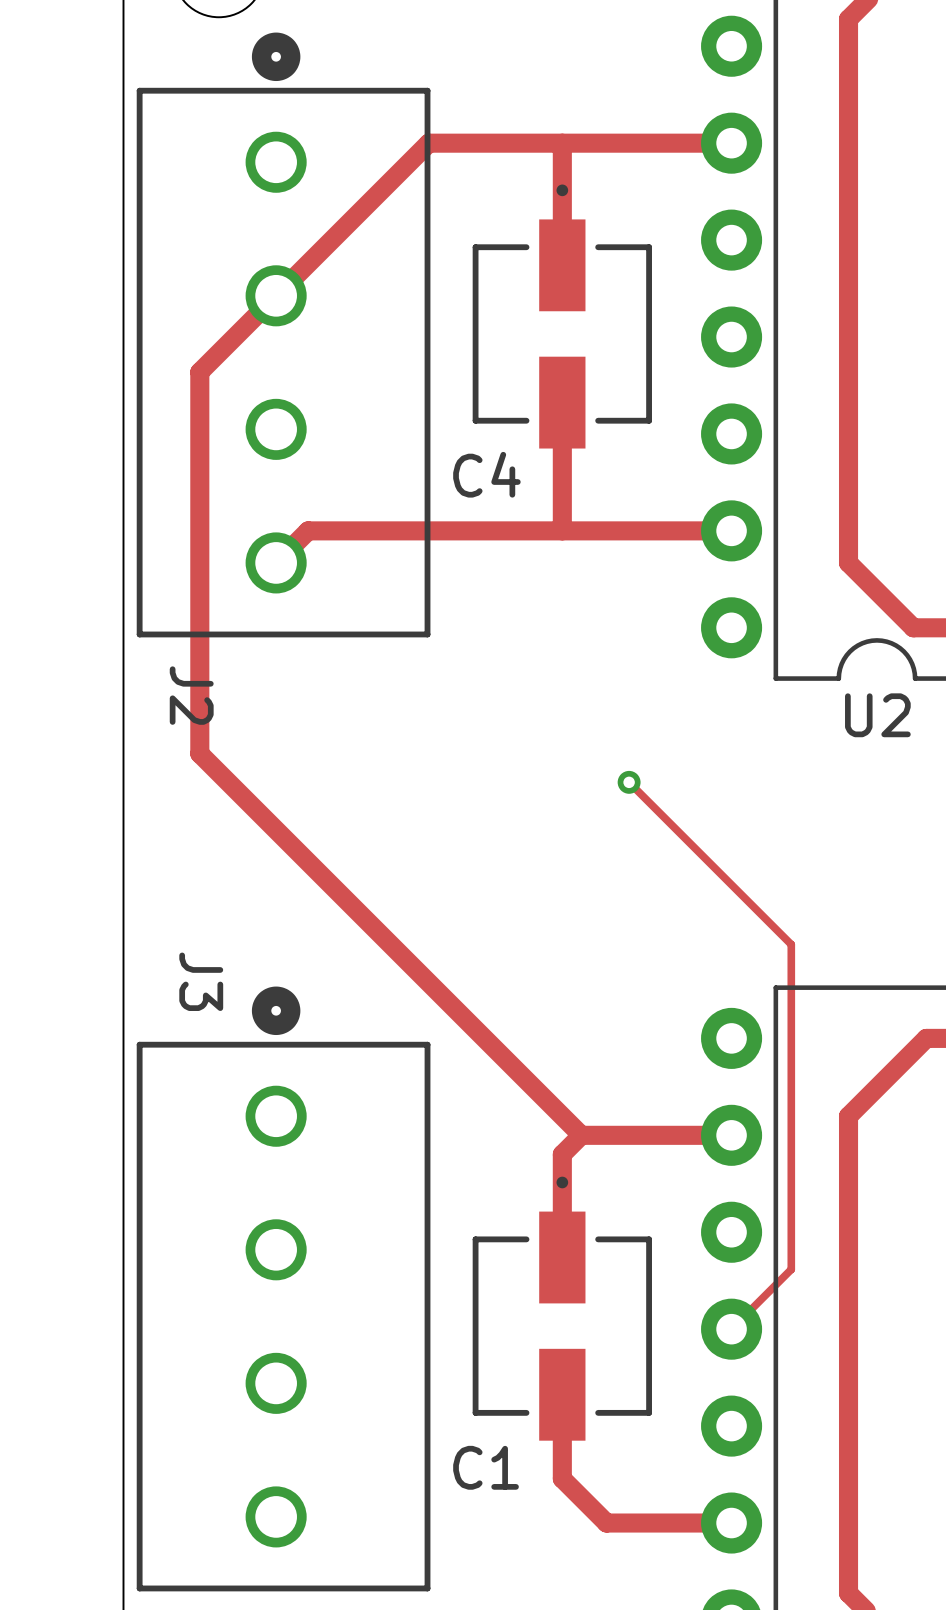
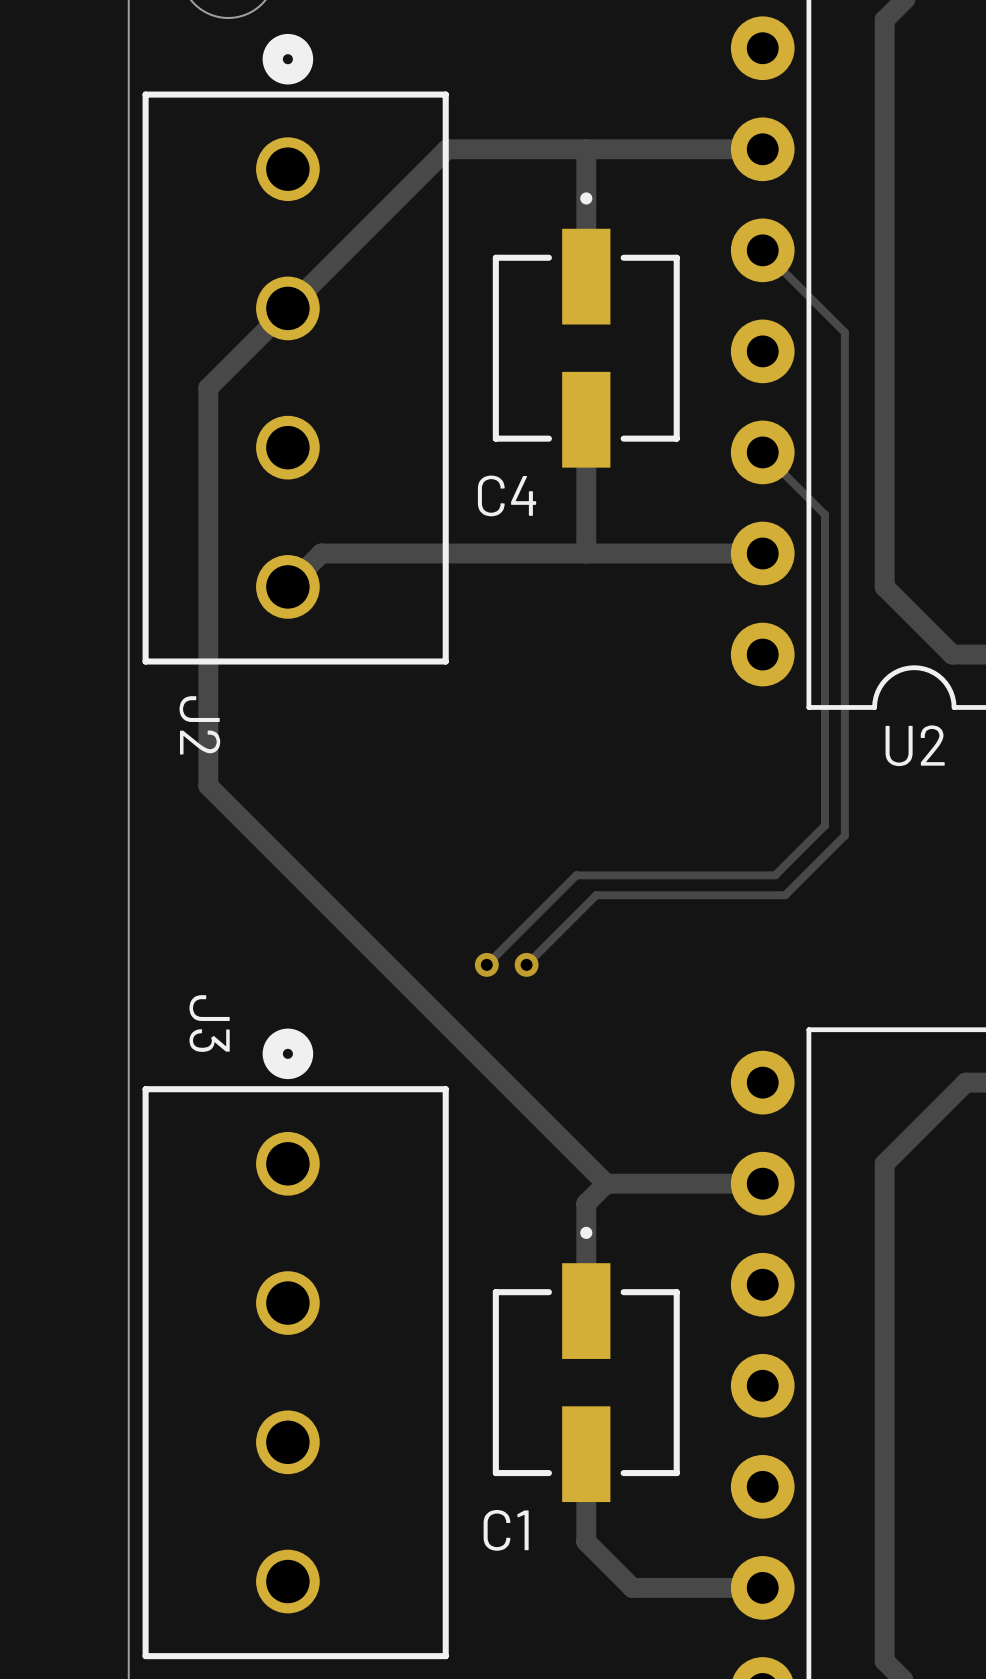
track: none -> (762, 250) (844, 332) (844, 835) (785, 895) (596, 895) (526, 964)
track: none -> (762, 452) (825, 514) (825, 825) (775, 875) (576, 875) (486, 964)
track: (629, 782) (791, 944) (791, 1269) (731, 1329) -> none
via: (629, 782) -> none
via: none -> (486, 964)
via: none -> (526, 964)

